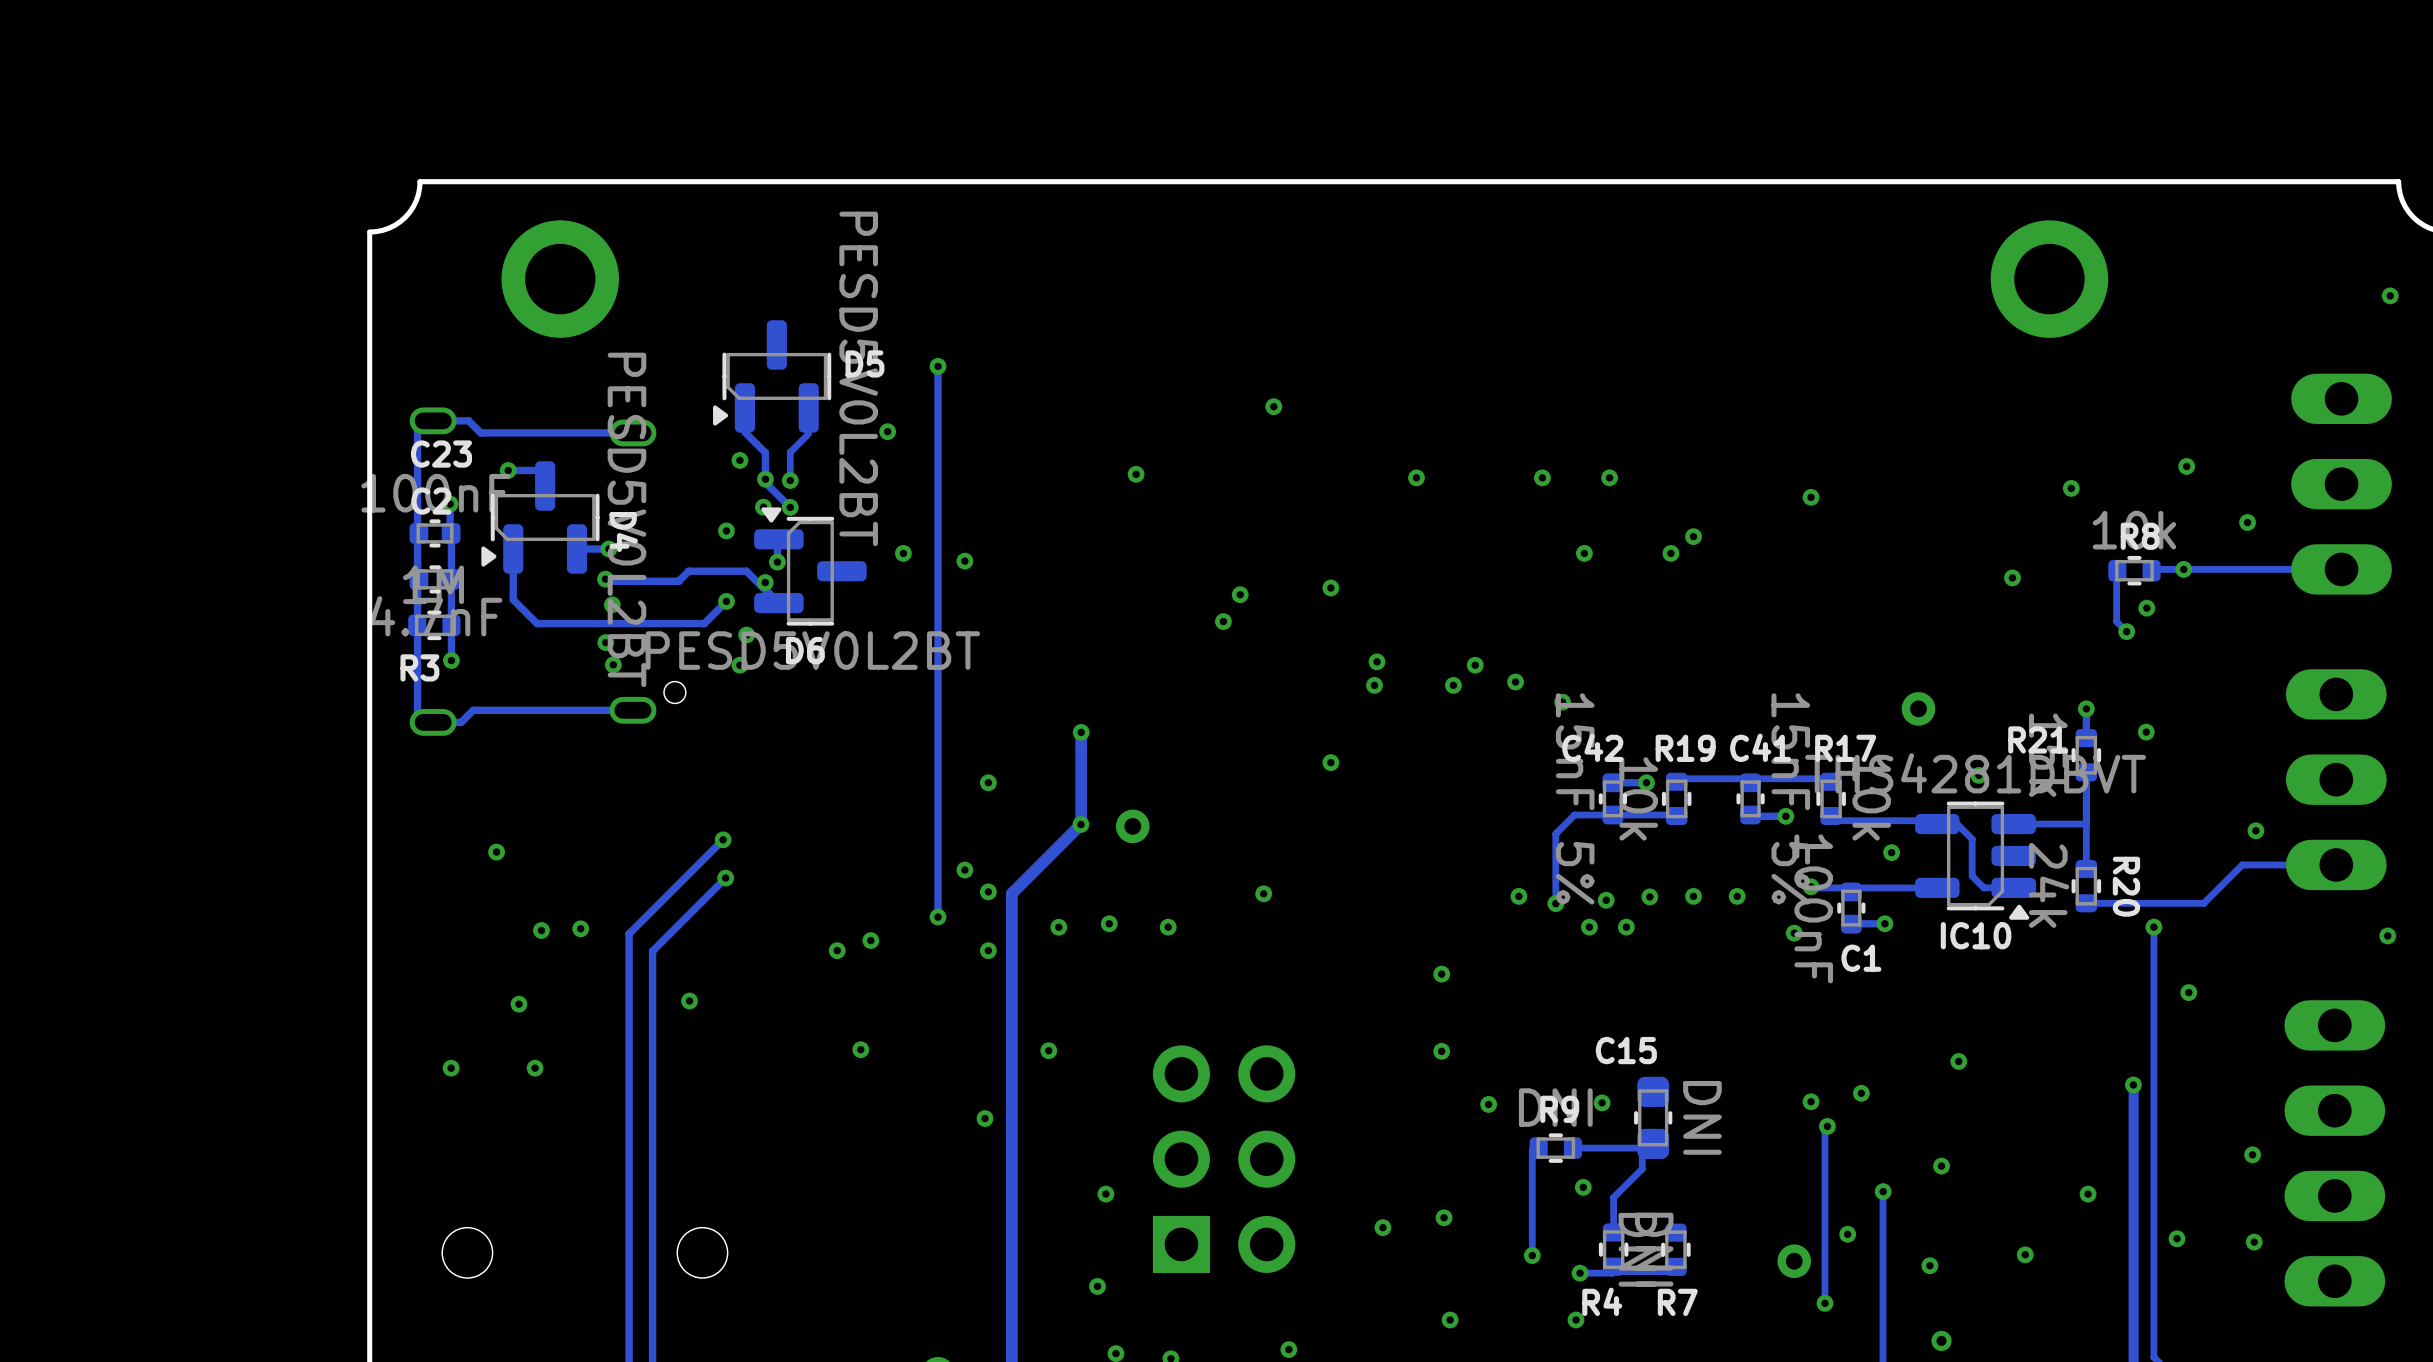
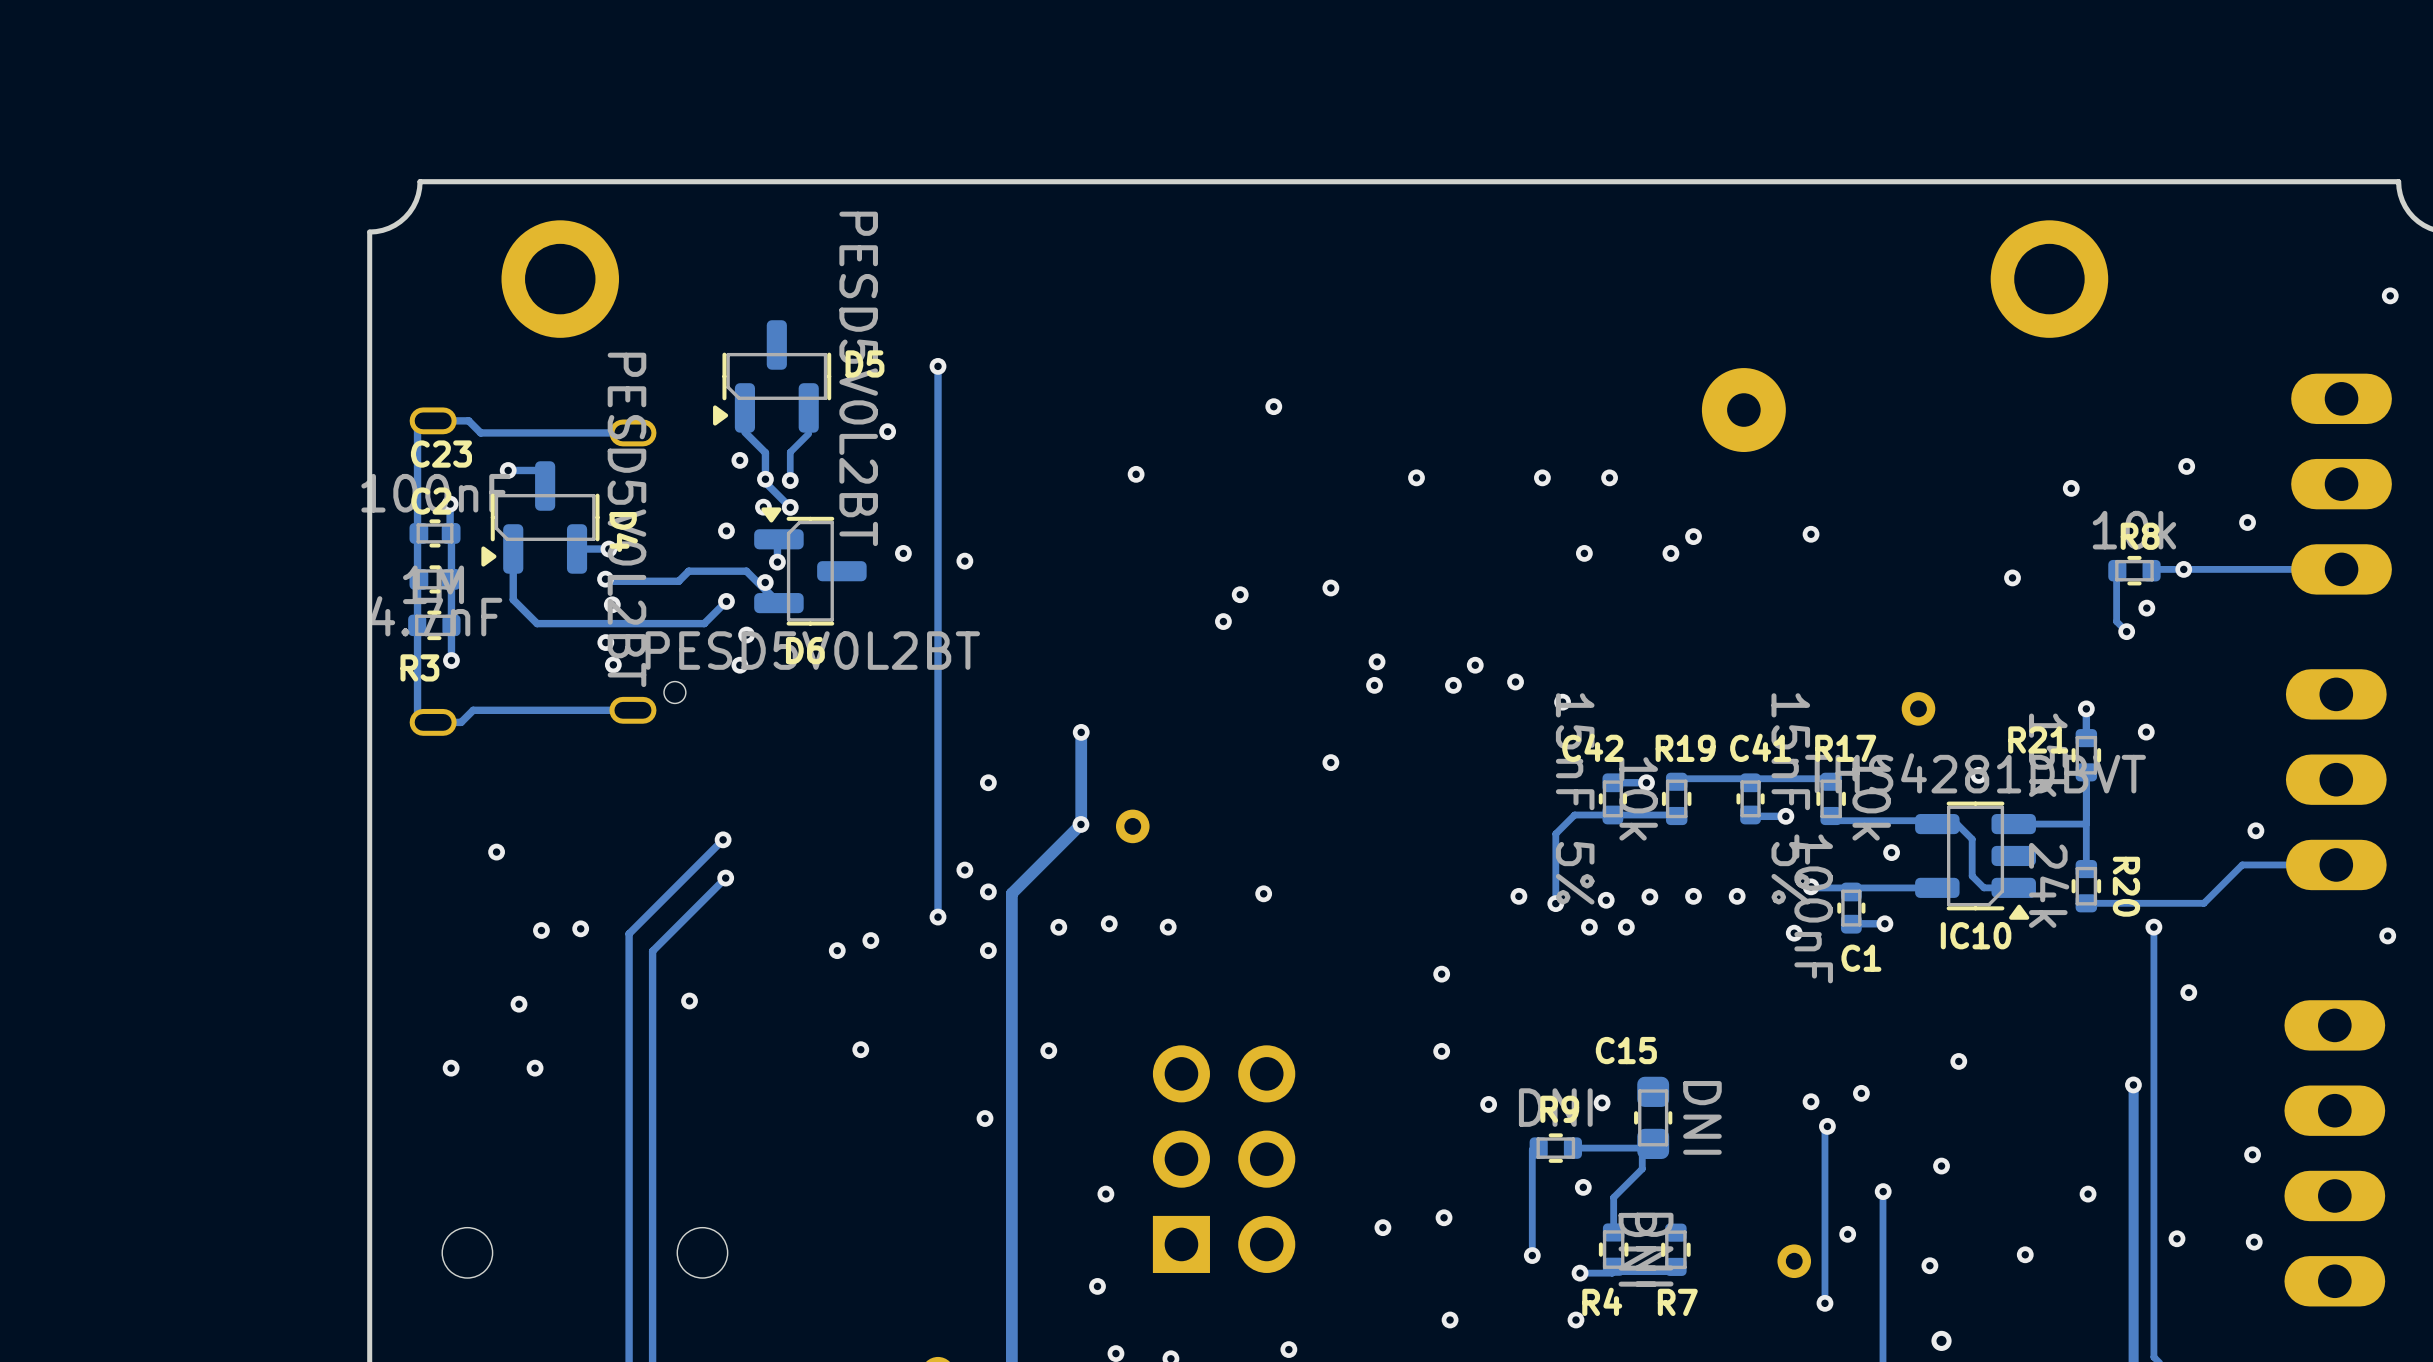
part: none -> (1743, 410)
via position: (1811, 497) -> (1811, 534)

